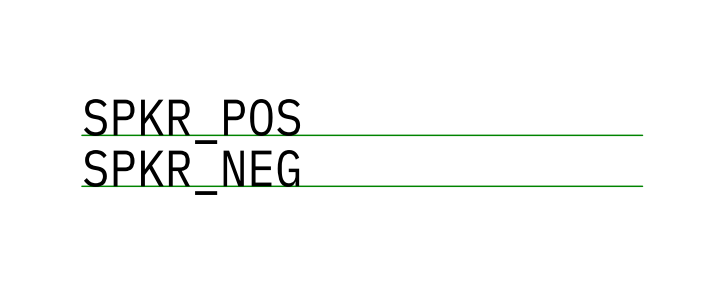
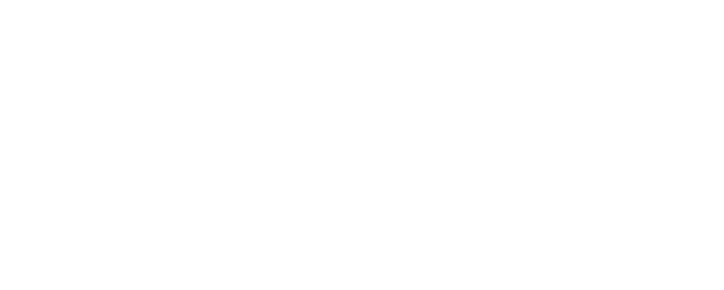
label: SPKR_POS (192, 121) -> none
wire: (81, 135) (642, 135) -> none
label: SPKR_NEG (191, 172) -> none
wire: (81, 186) (642, 186) -> none

